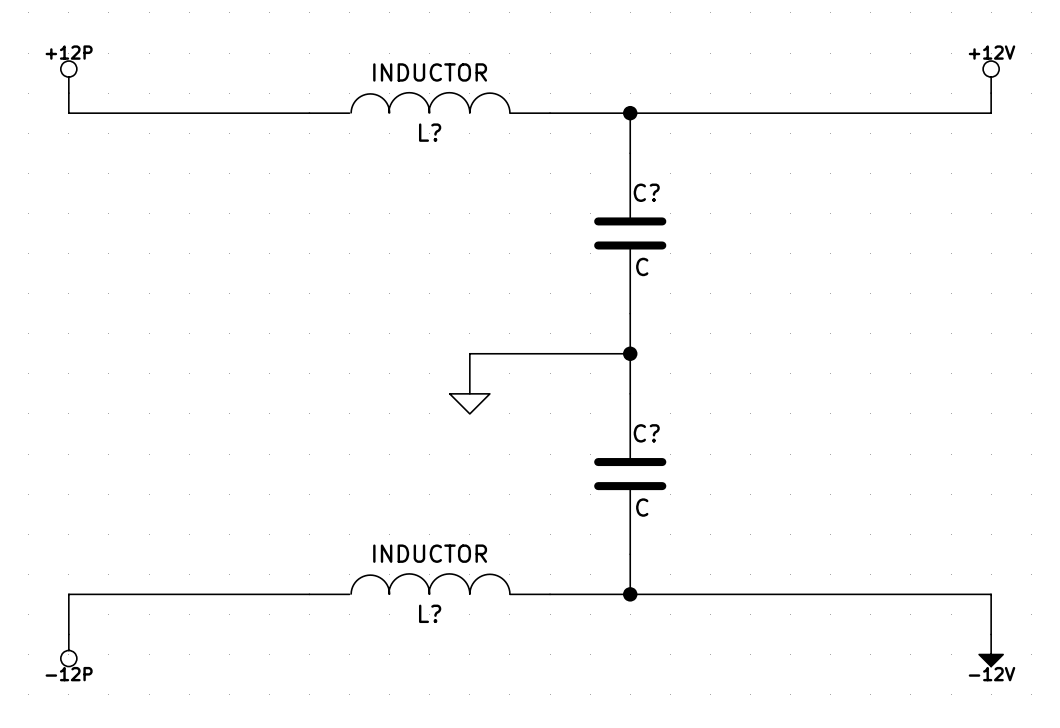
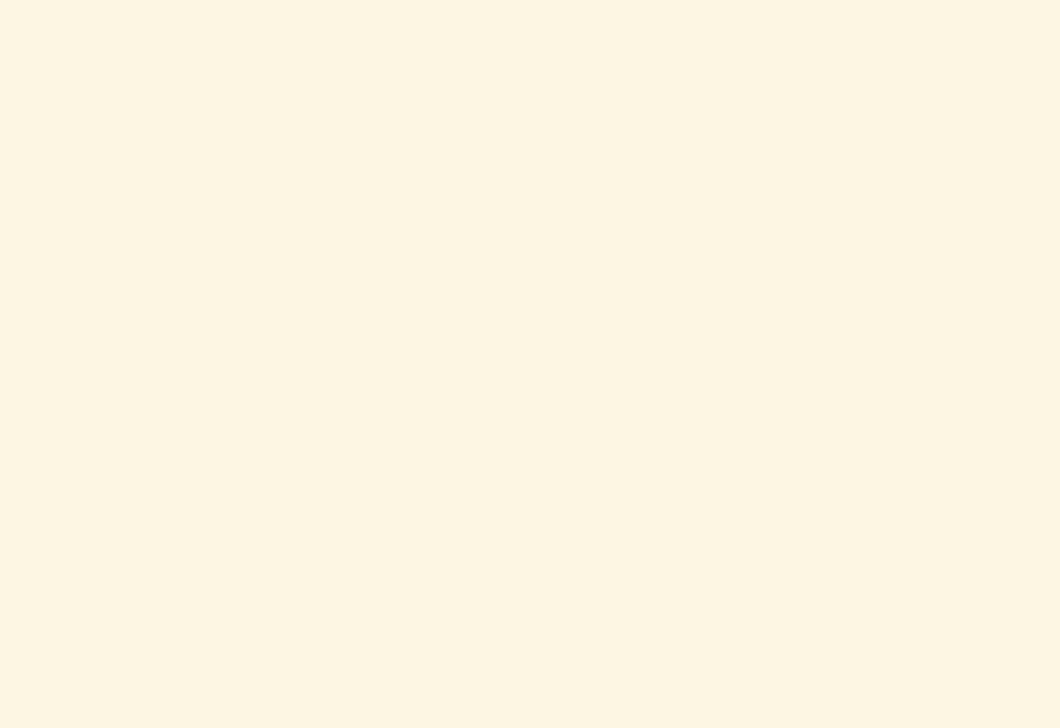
power symbol: +12P (68, 77) -> none
power symbol: +12V (991, 77) -> none
wire: (68, 93) (68, 113) (309, 113) -> none
wire: (991, 93) (991, 113) (550, 113) -> none
L?: INDUCTOR (429, 102) -> none
wire: (630, 113) (630, 153) -> none
junction: (630, 113) -> none
C?: C (630, 233) -> none
wire: (630, 313) (630, 393) -> none
wire: (630, 353) (469, 353) (469, 393) -> none
junction: (630, 353) -> none
power symbol: (469, 403) -> none
C?: C (630, 474) -> none
wire: (630, 554) (630, 594) -> none
L?: INDUCTOR (429, 584) -> none
wire: (309, 594) (68, 594) (68, 634) -> none
wire: (550, 594) (991, 594) (991, 634) -> none
junction: (630, 594) -> none
power symbol: -12P (68, 650) -> none
power symbol: -12V (991, 650) -> none

